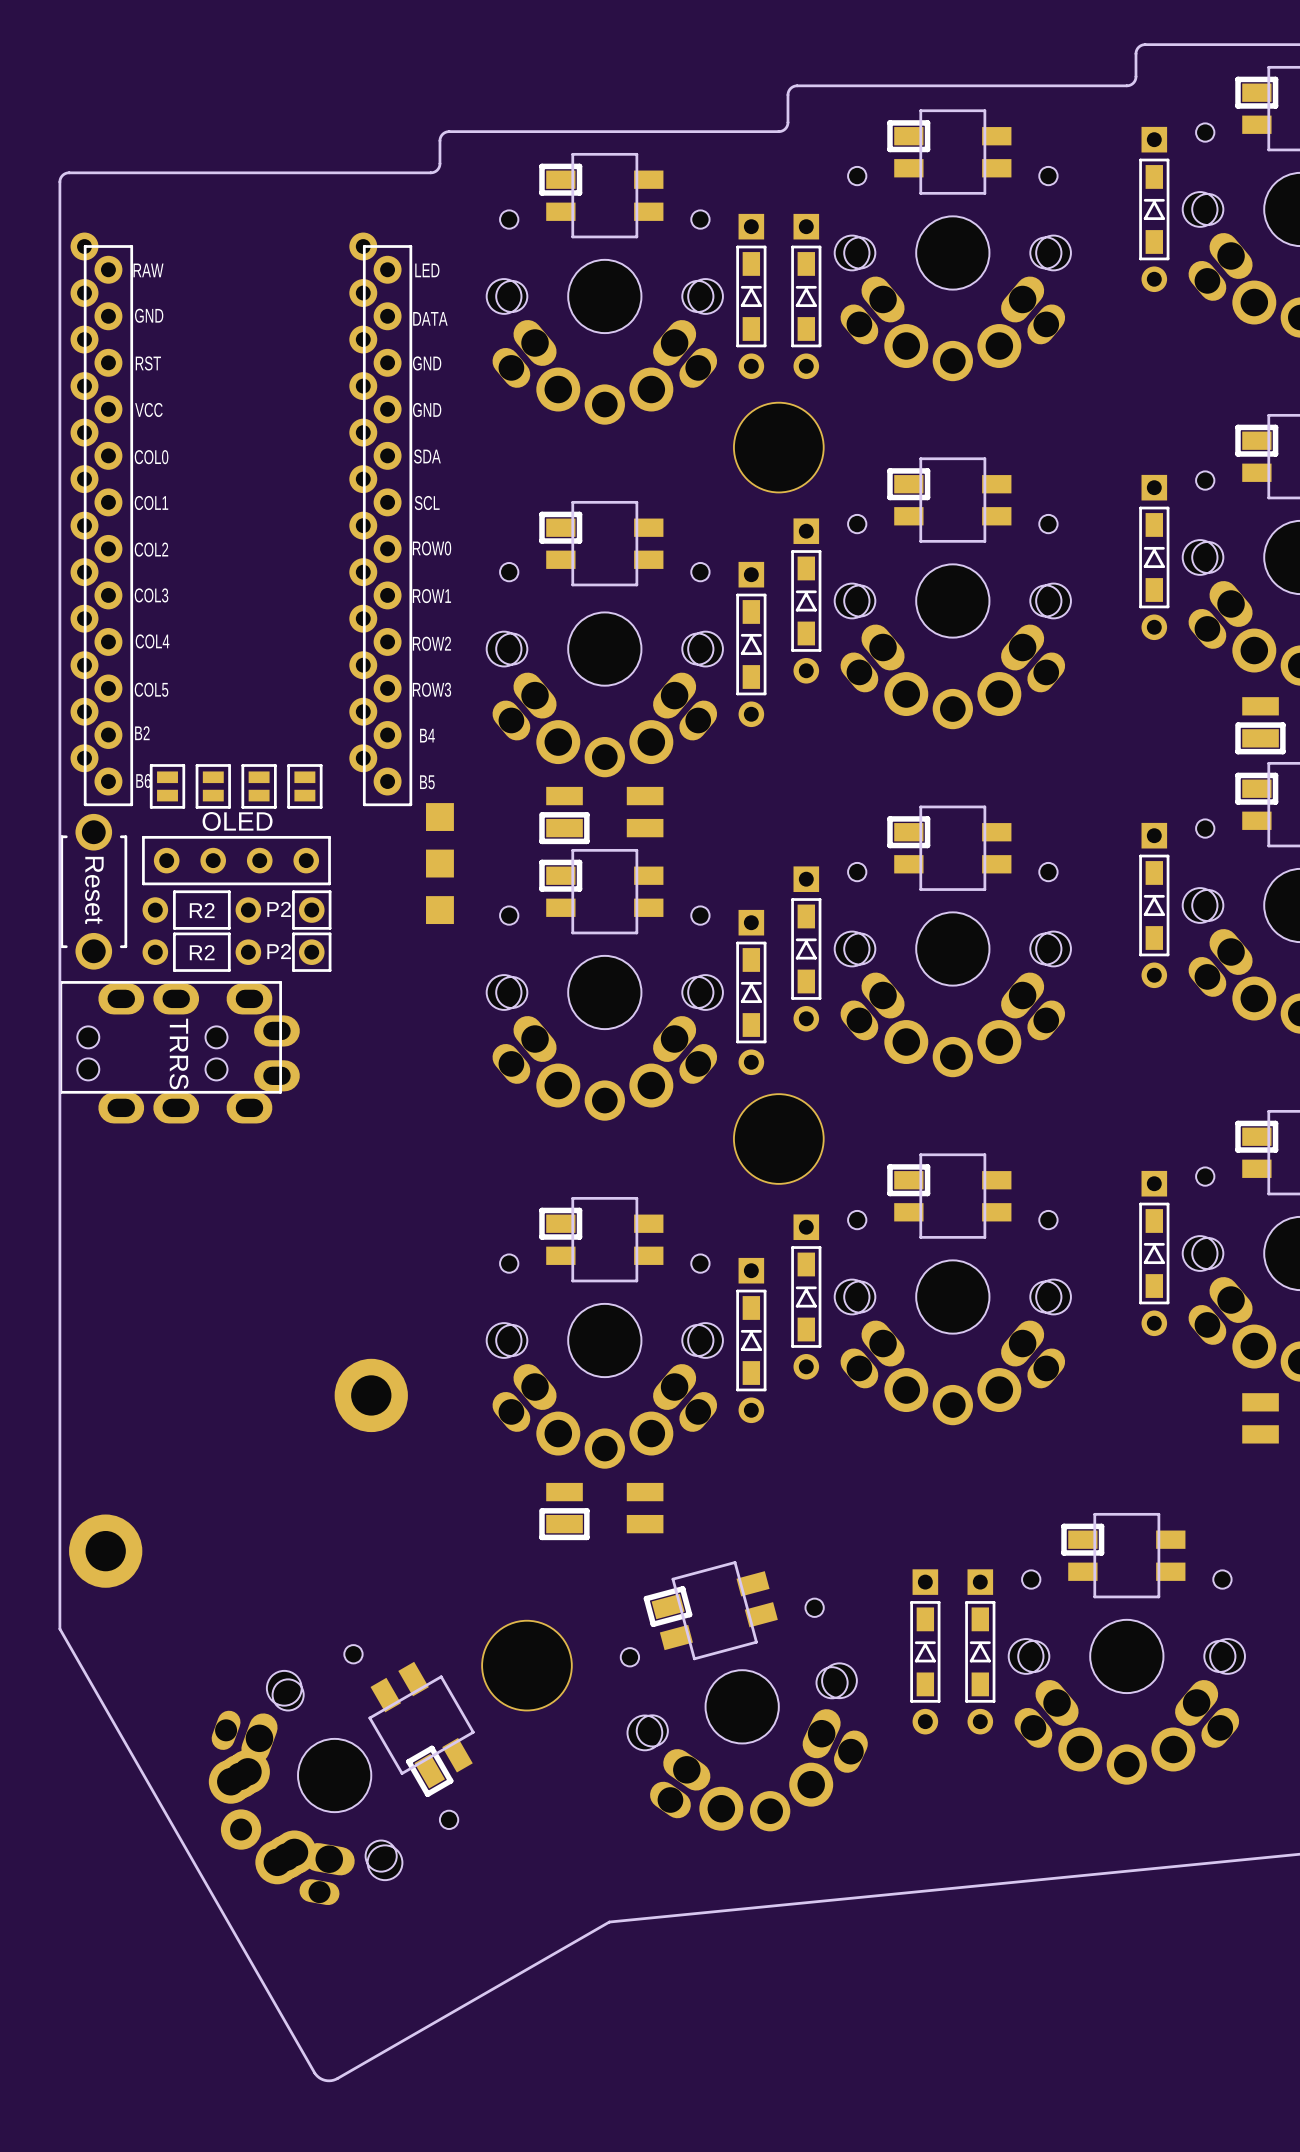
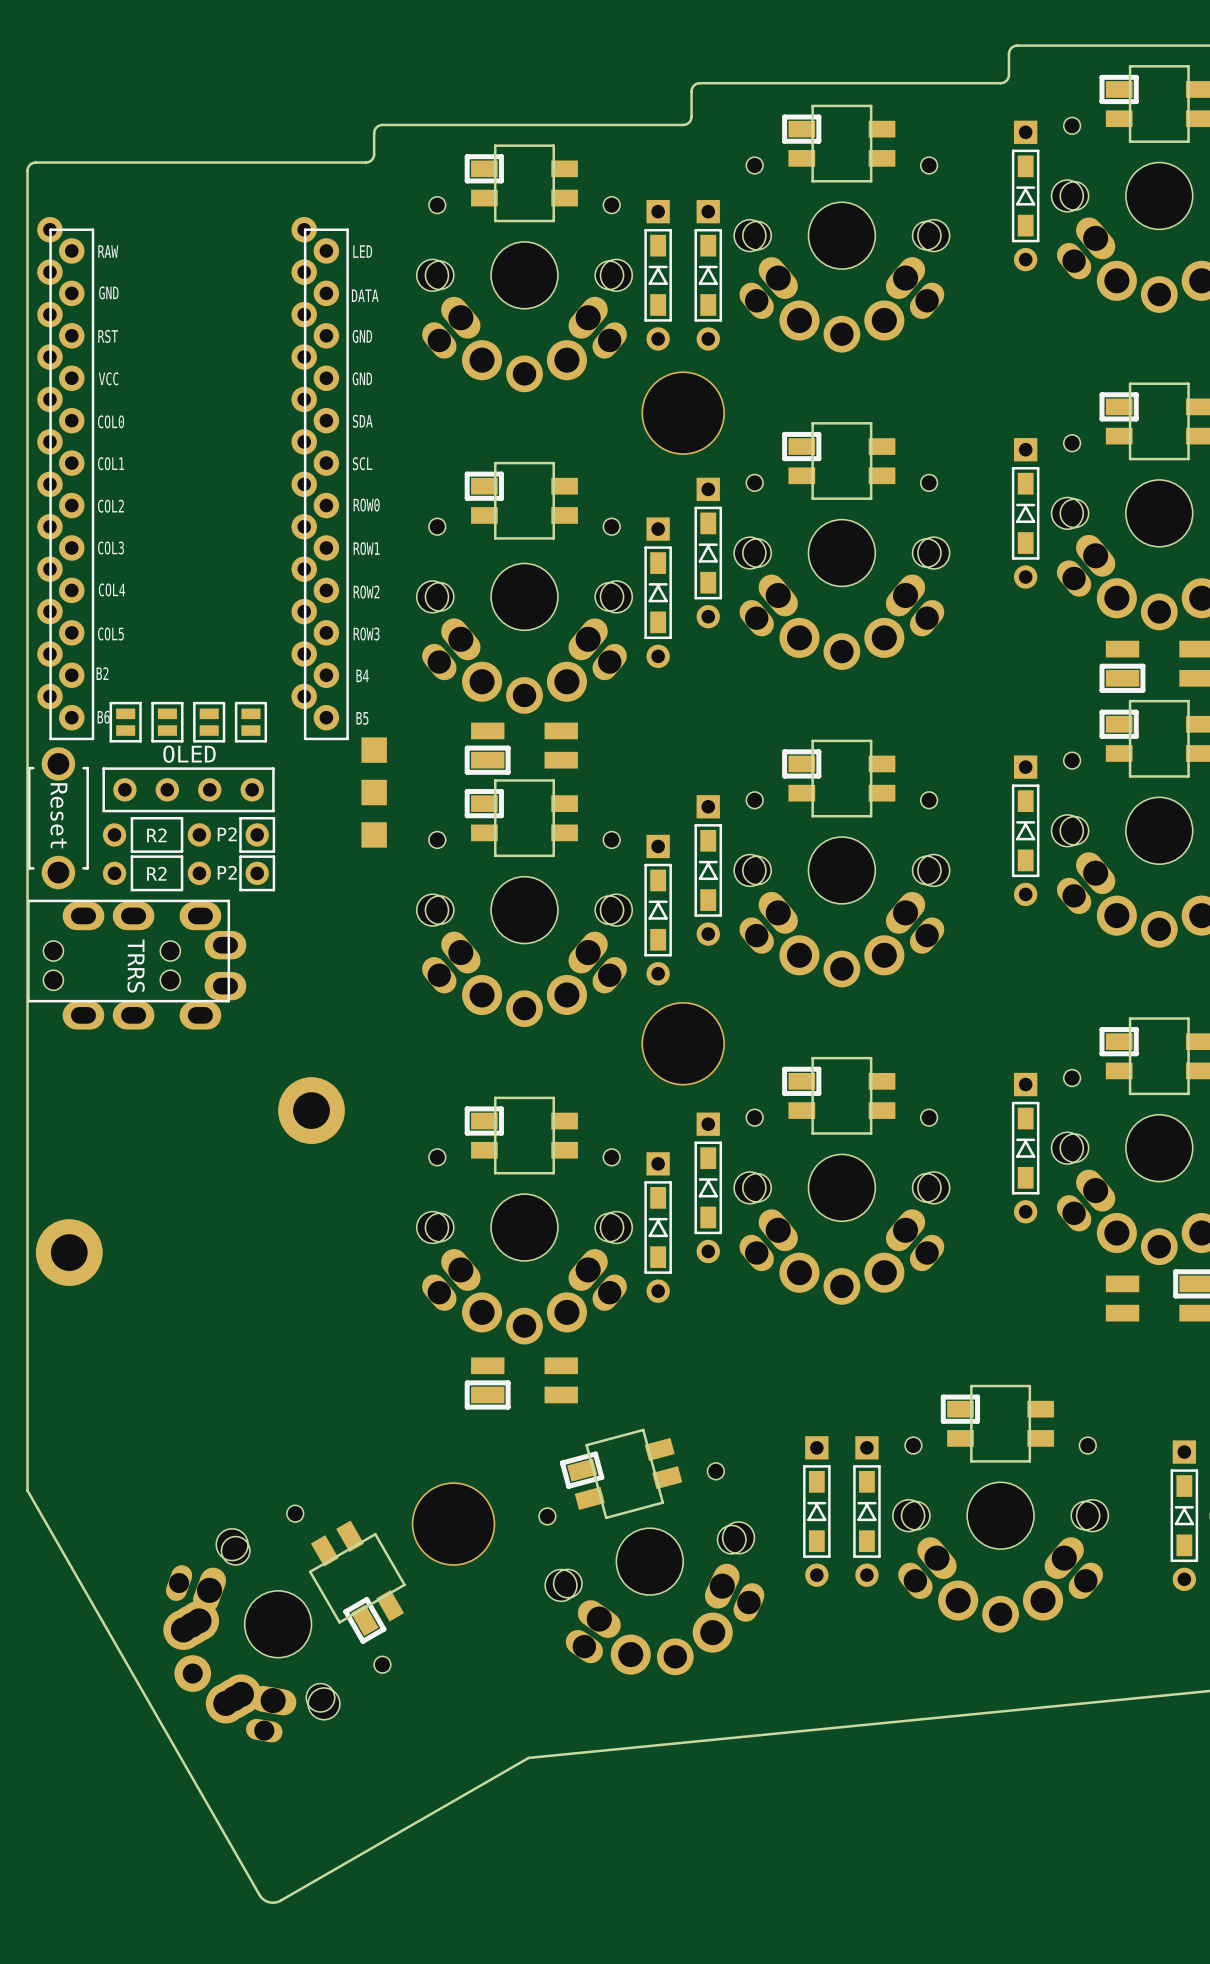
part: none -> (311, 1110)
part: none -> (69, 1252)
part: (371, 1395) -> none
part: (105, 1551) -> none

